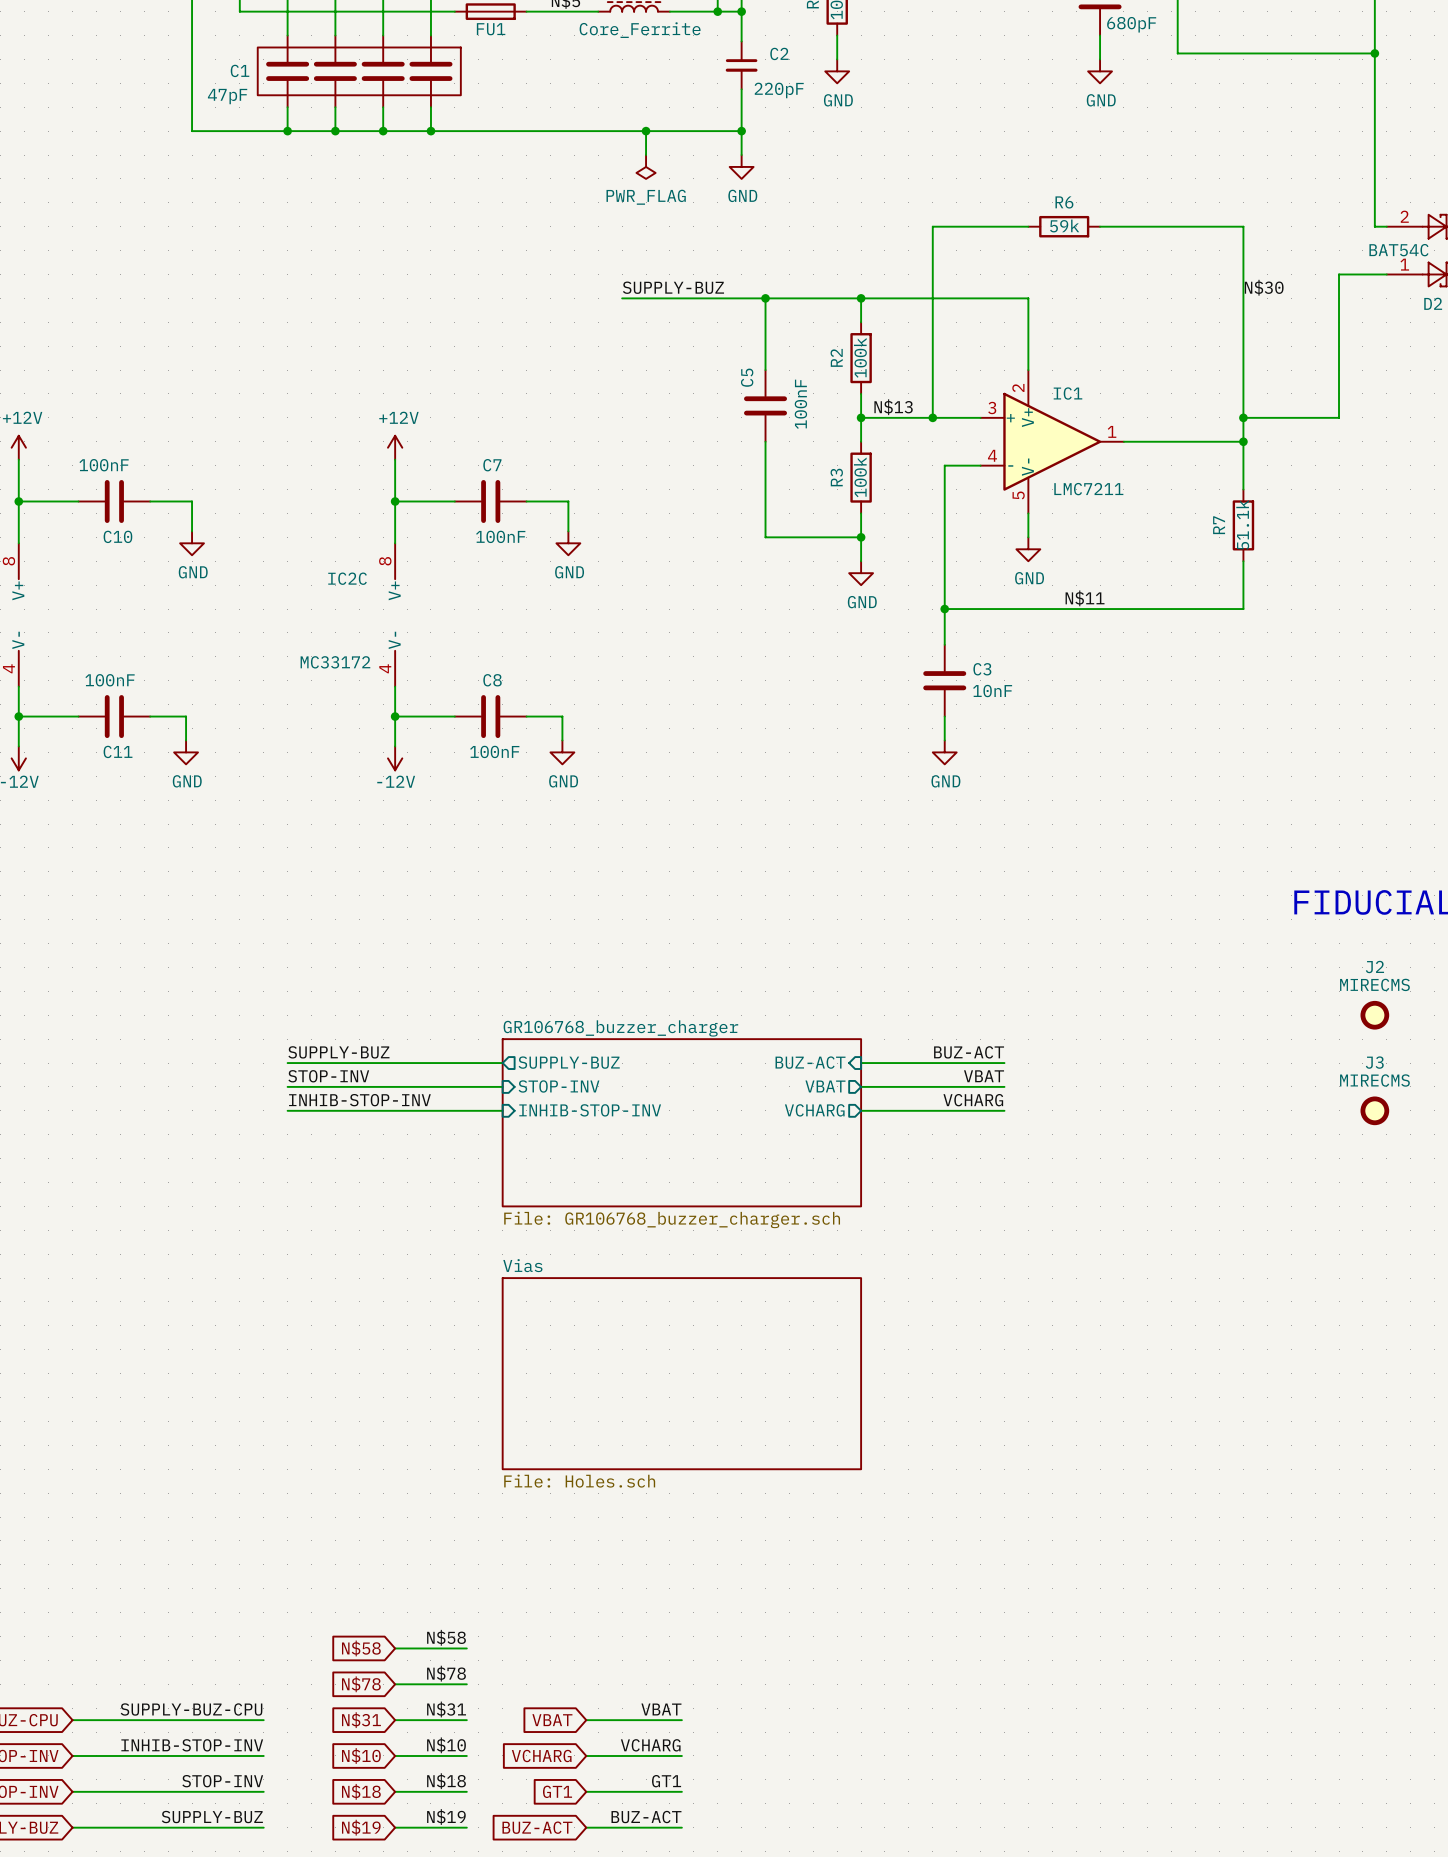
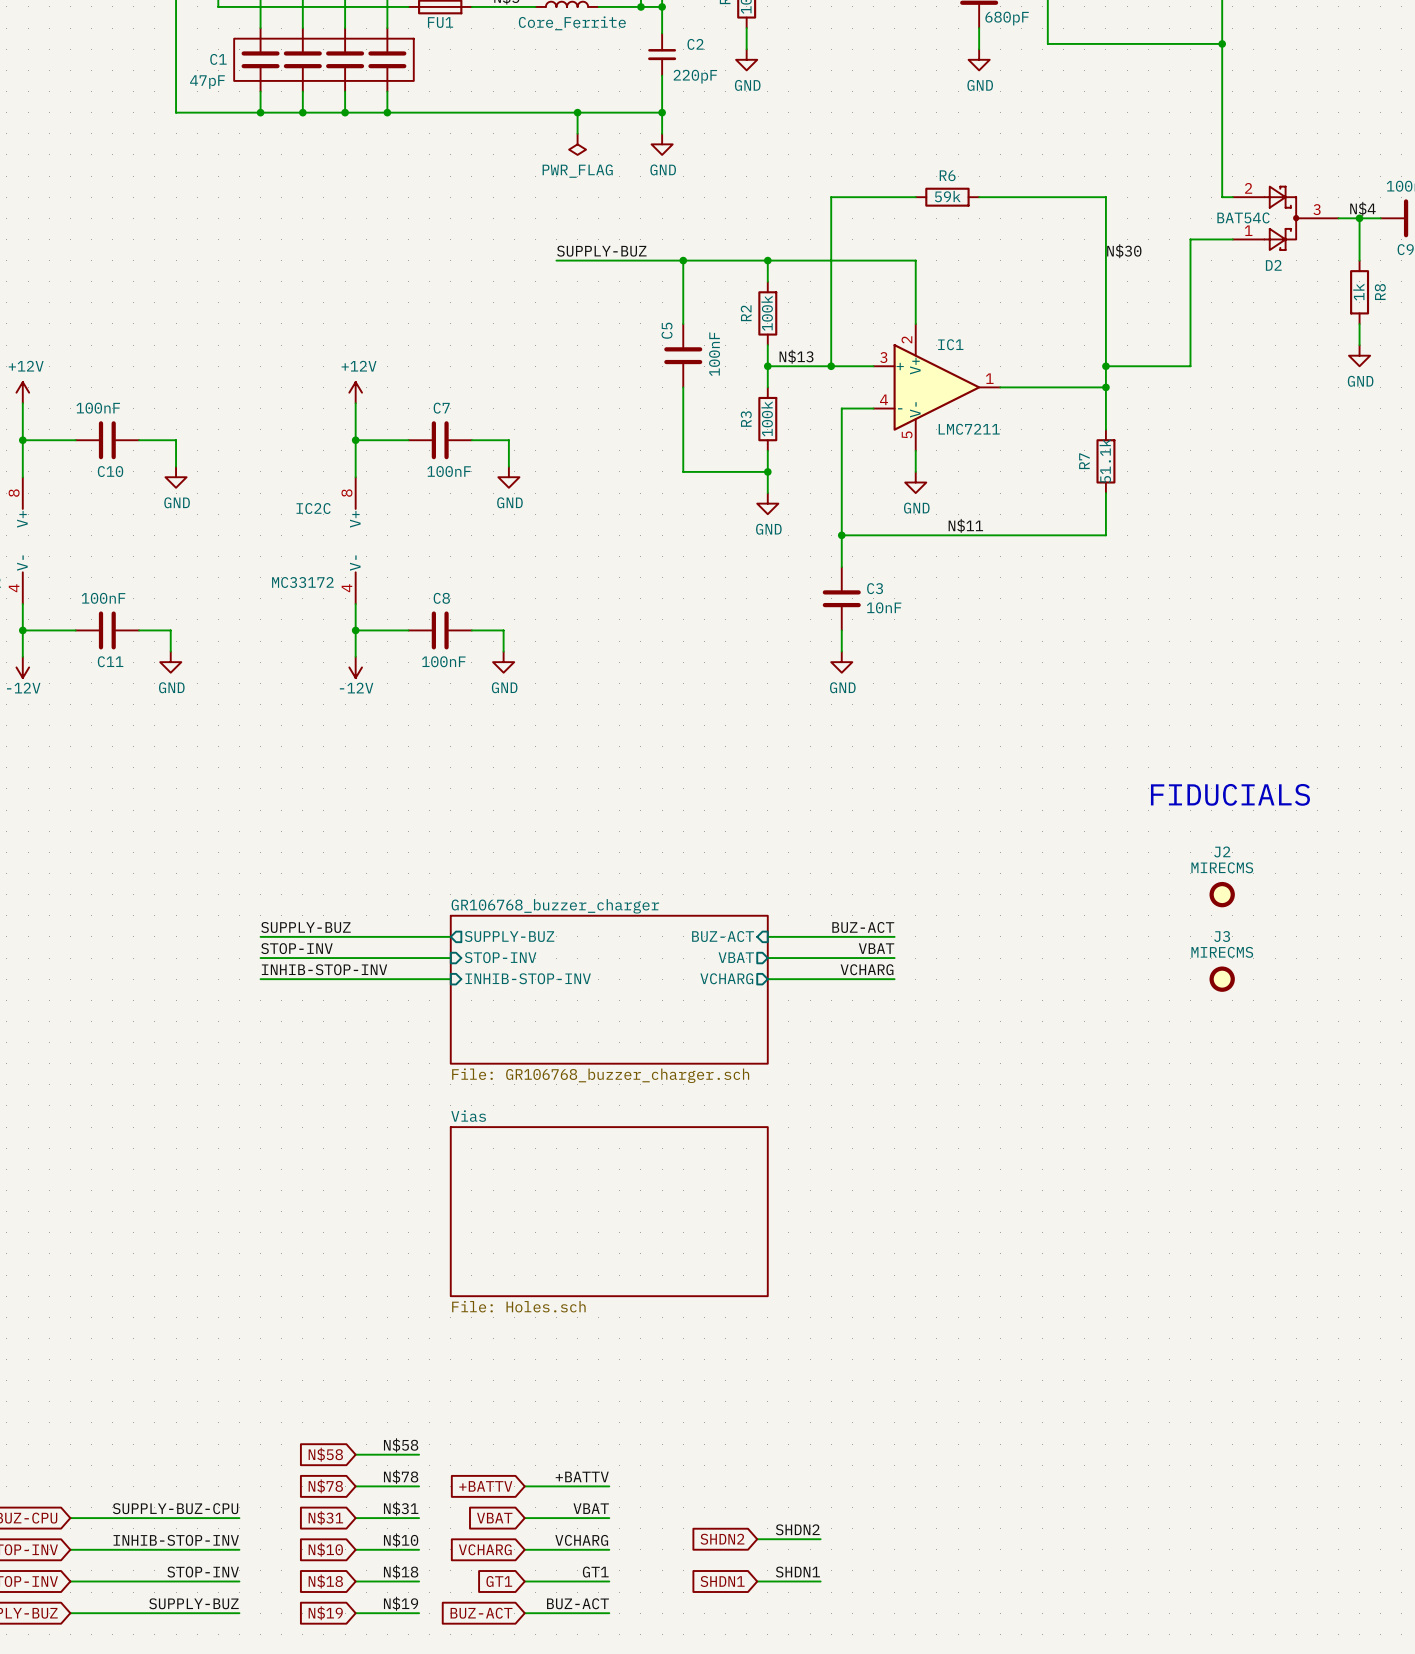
label: none -> +BATTV (582, 1476)
global label: none -> +BATTV (485, 1486)
wire: none -> (524, 1486) (609, 1486)
label: none -> SHDN2 (797, 1529)
global label: none -> SHDN2 (722, 1539)
wire: none -> (757, 1539) (820, 1539)
label: none -> SHDN1 (797, 1572)
global label: none -> SHDN1 (722, 1581)
wire: none -> (757, 1581) (820, 1581)

